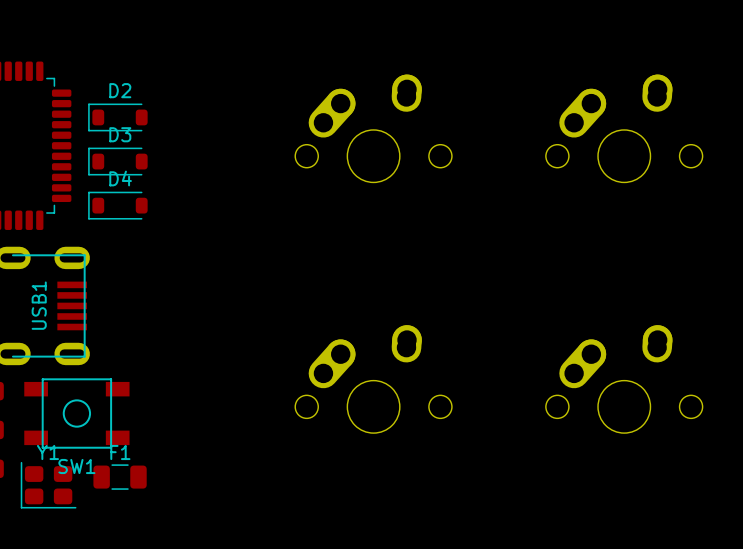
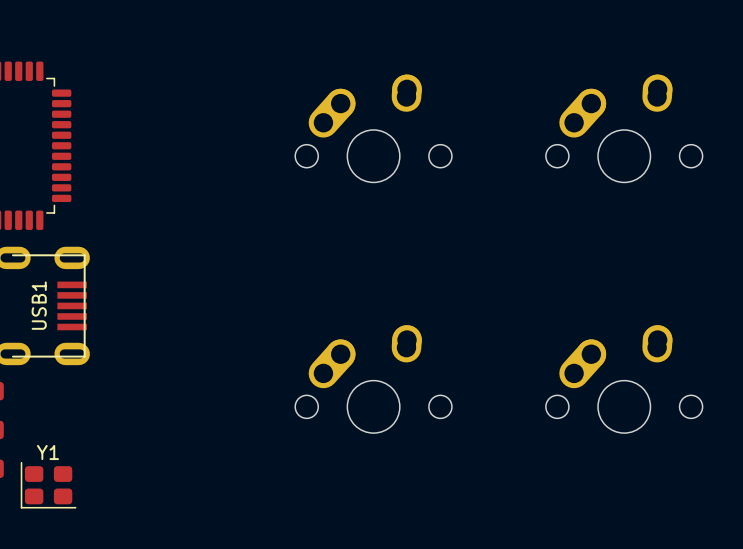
D2: (117, 117) -> none
D3: (117, 161) -> none
D4: (117, 205) -> none
SW1: (76, 413) -> none
F1: (120, 477) -> none

